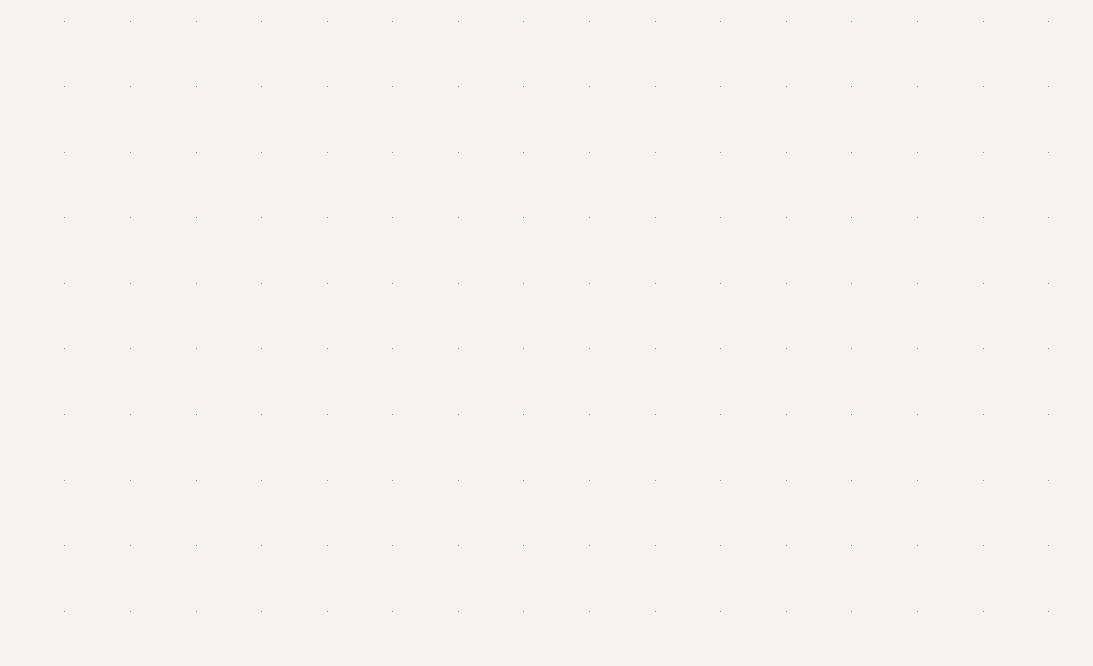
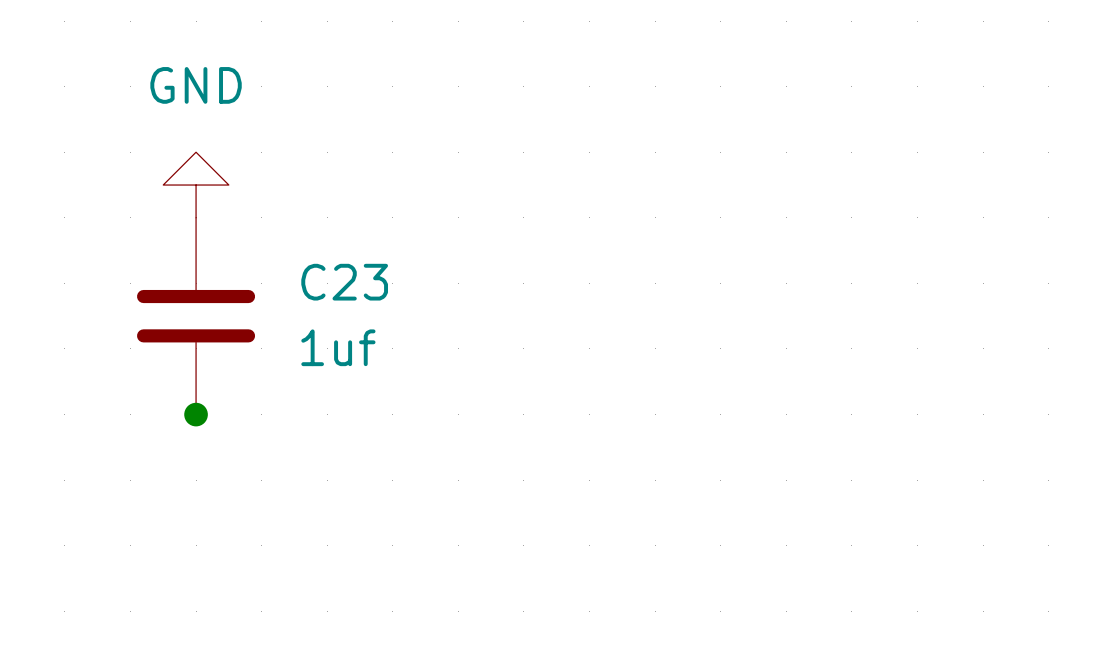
power symbol: none -> GND (196, 185)
C23: none -> 1uf (196, 316)
junction: none -> (196, 414)

